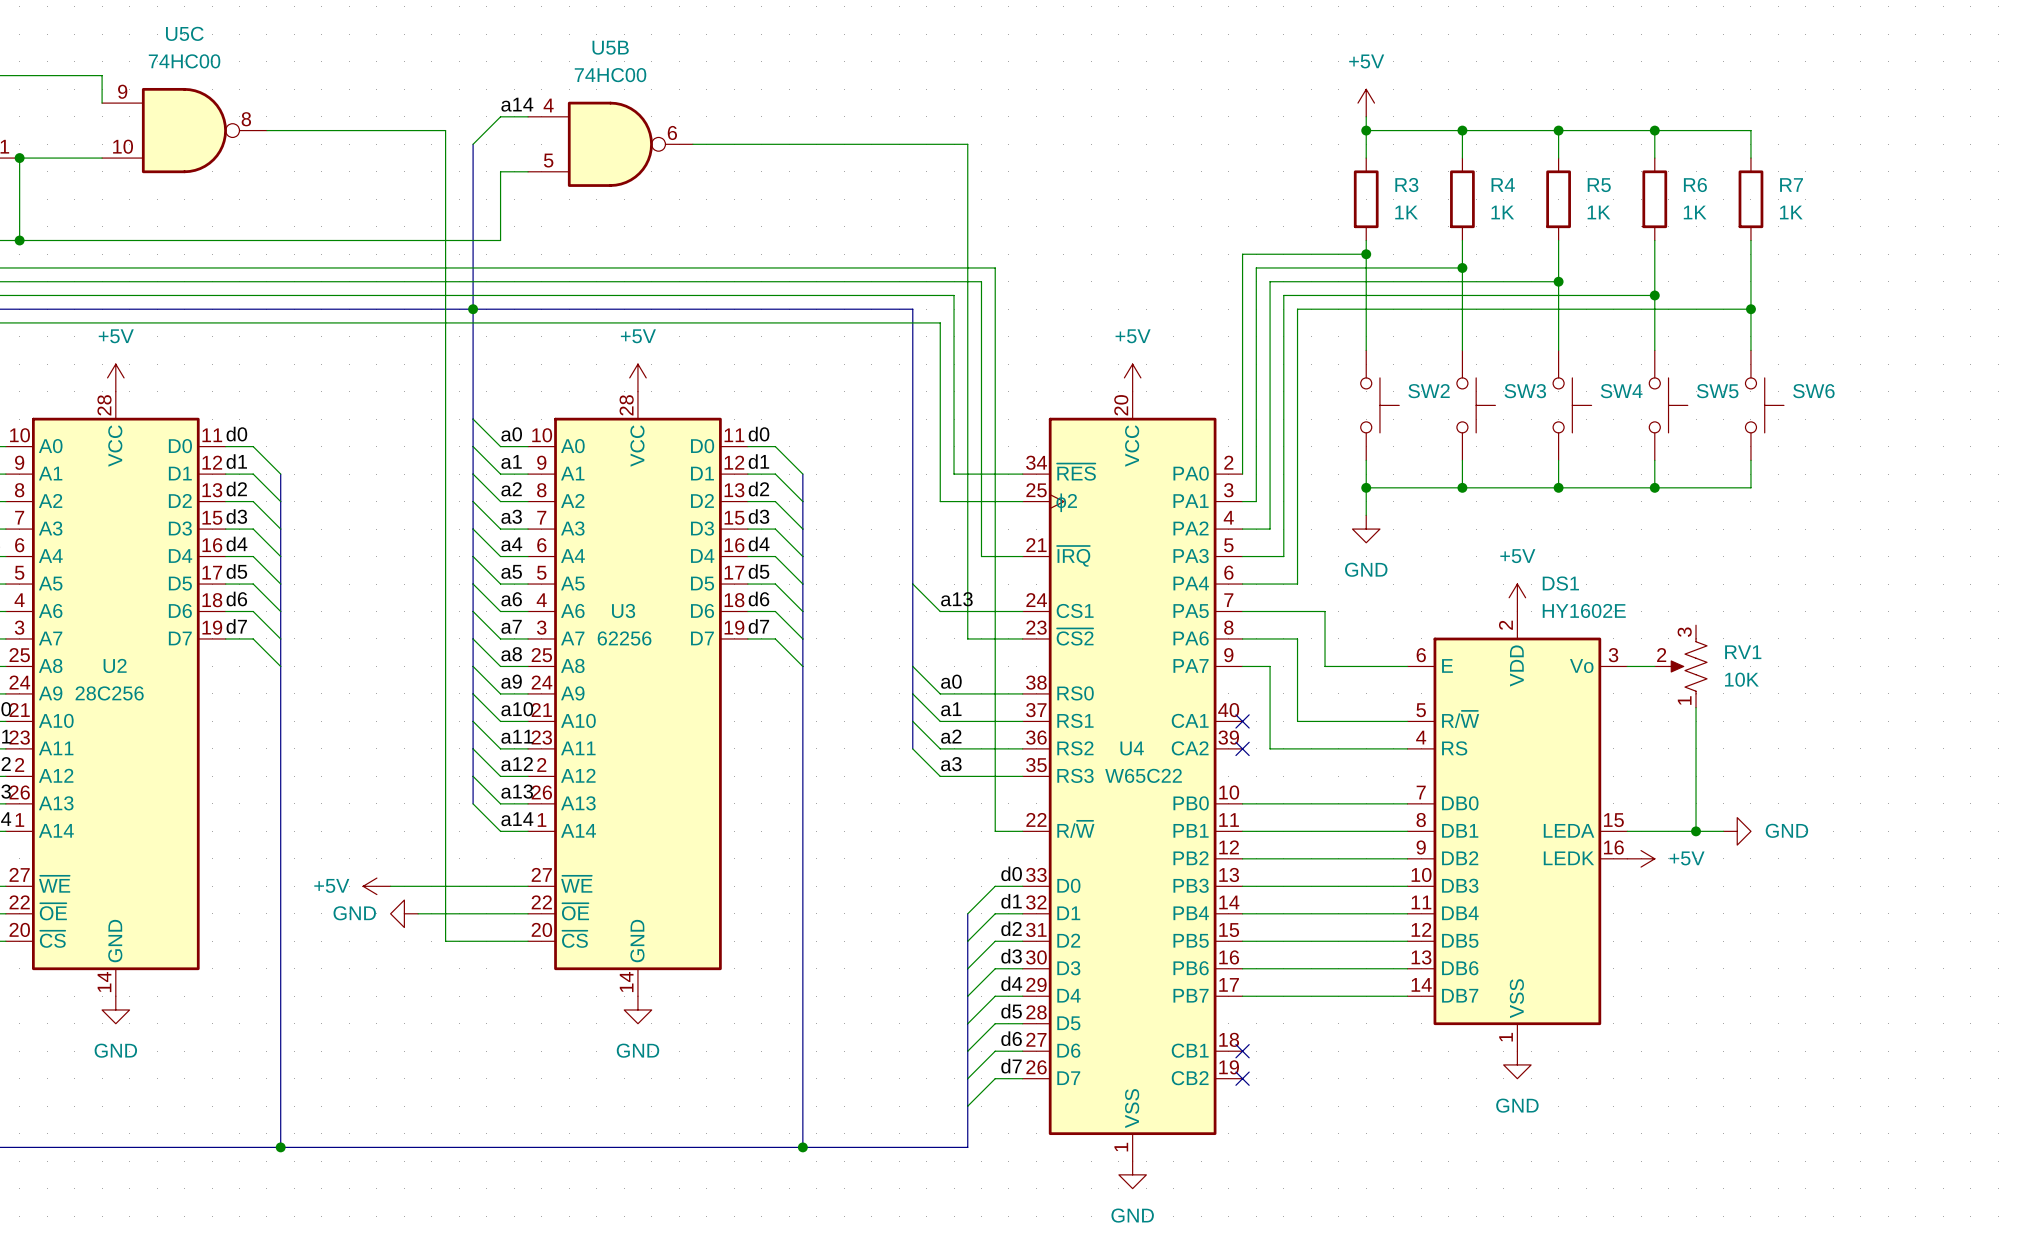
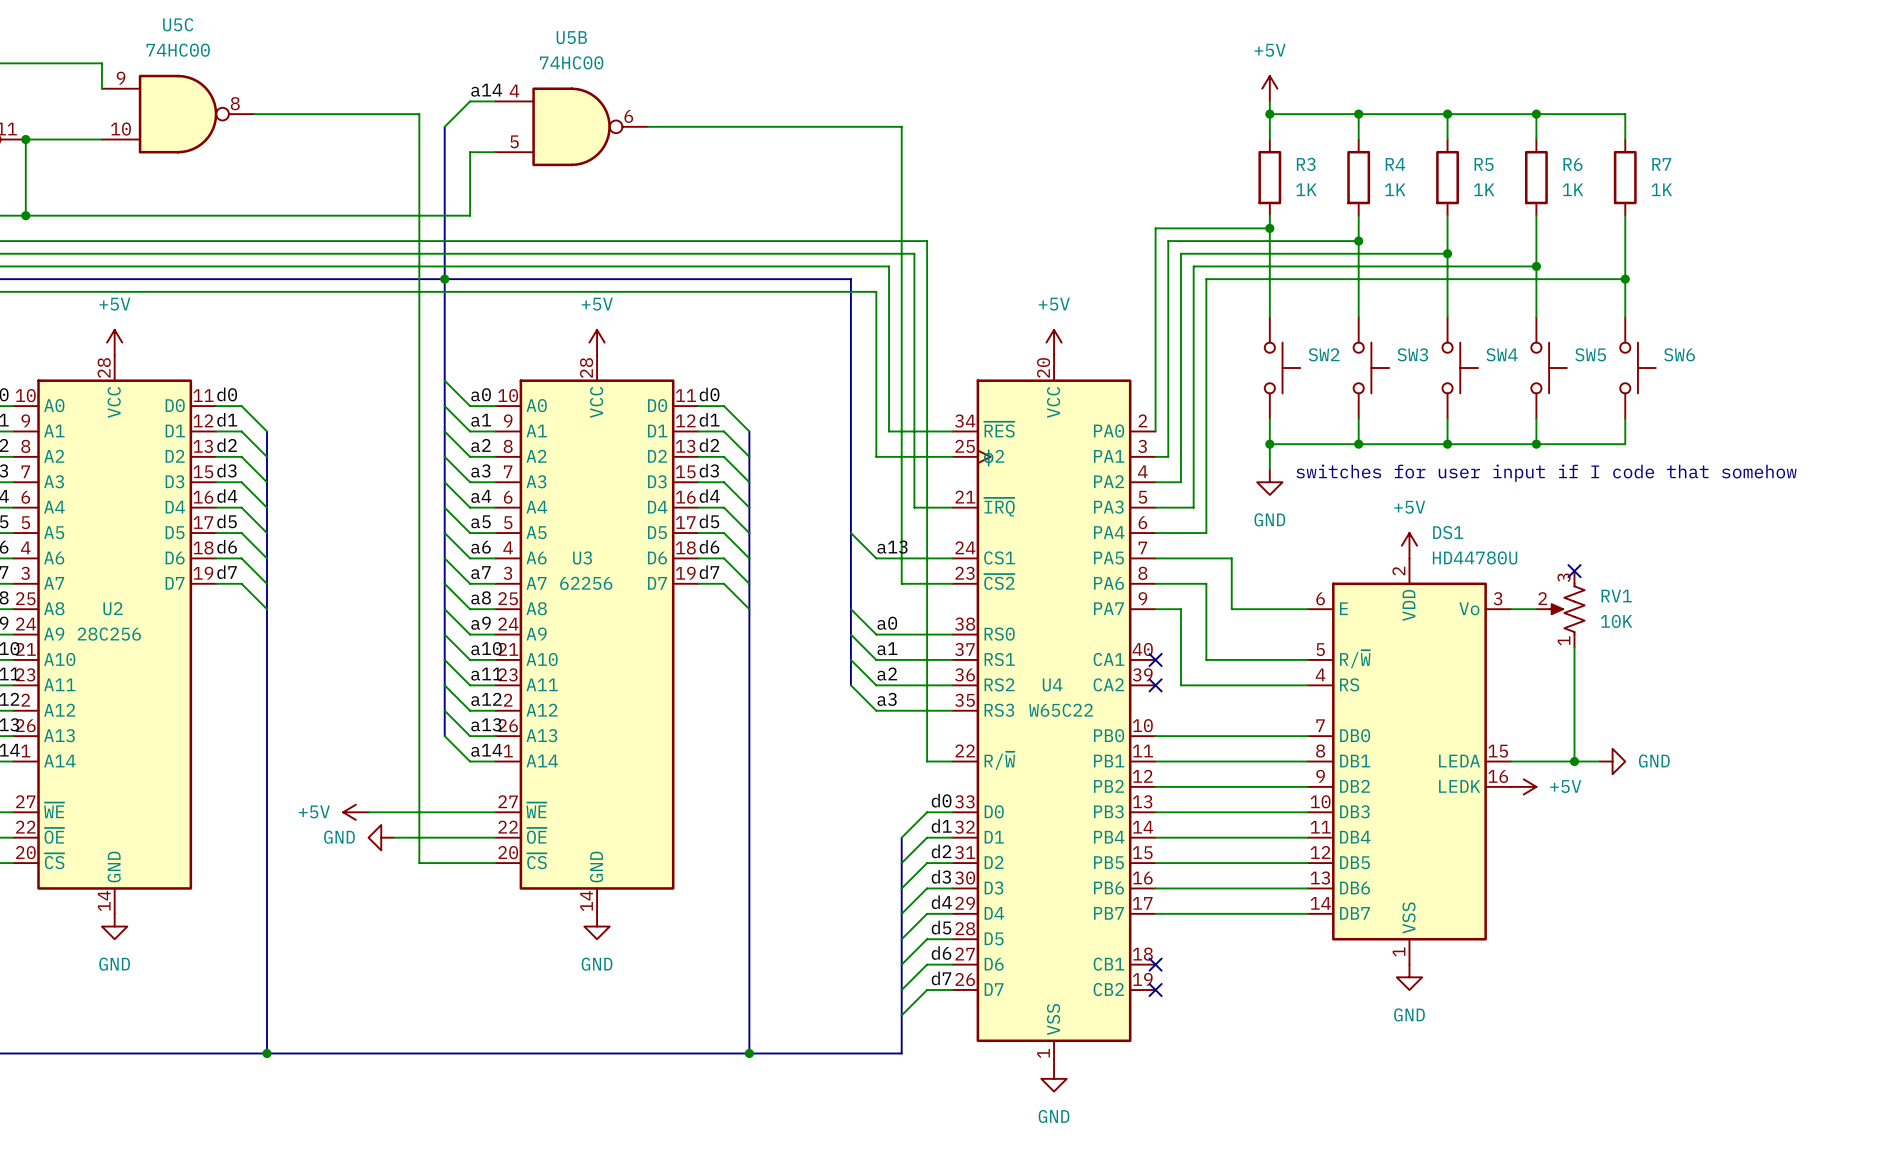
text: none -> switches for user input if I code that somehow (1546, 473)
DS1 value: HY1602E (1584, 610) -> HD44780U (1475, 557)
no-connect mark: none -> (1574, 571)

